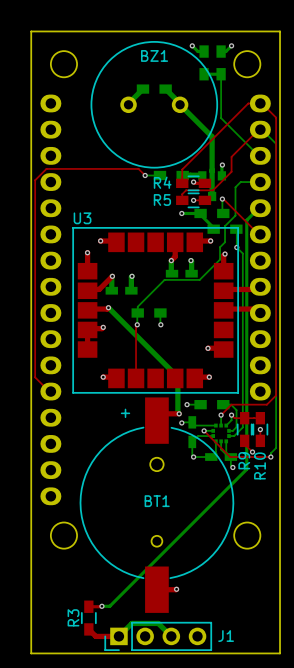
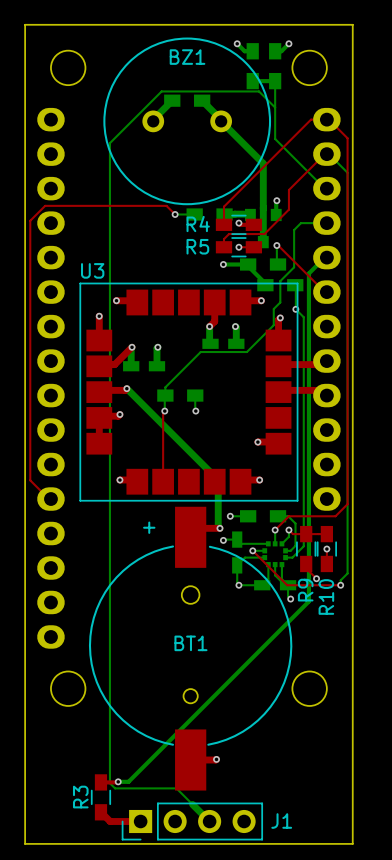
bottom track: (158, 623) (131, 623) (118, 636) -> (192, 804) (176, 788) (115, 788) (109, 783) (109, 143) (161, 91) (259, 91) (275, 107)

